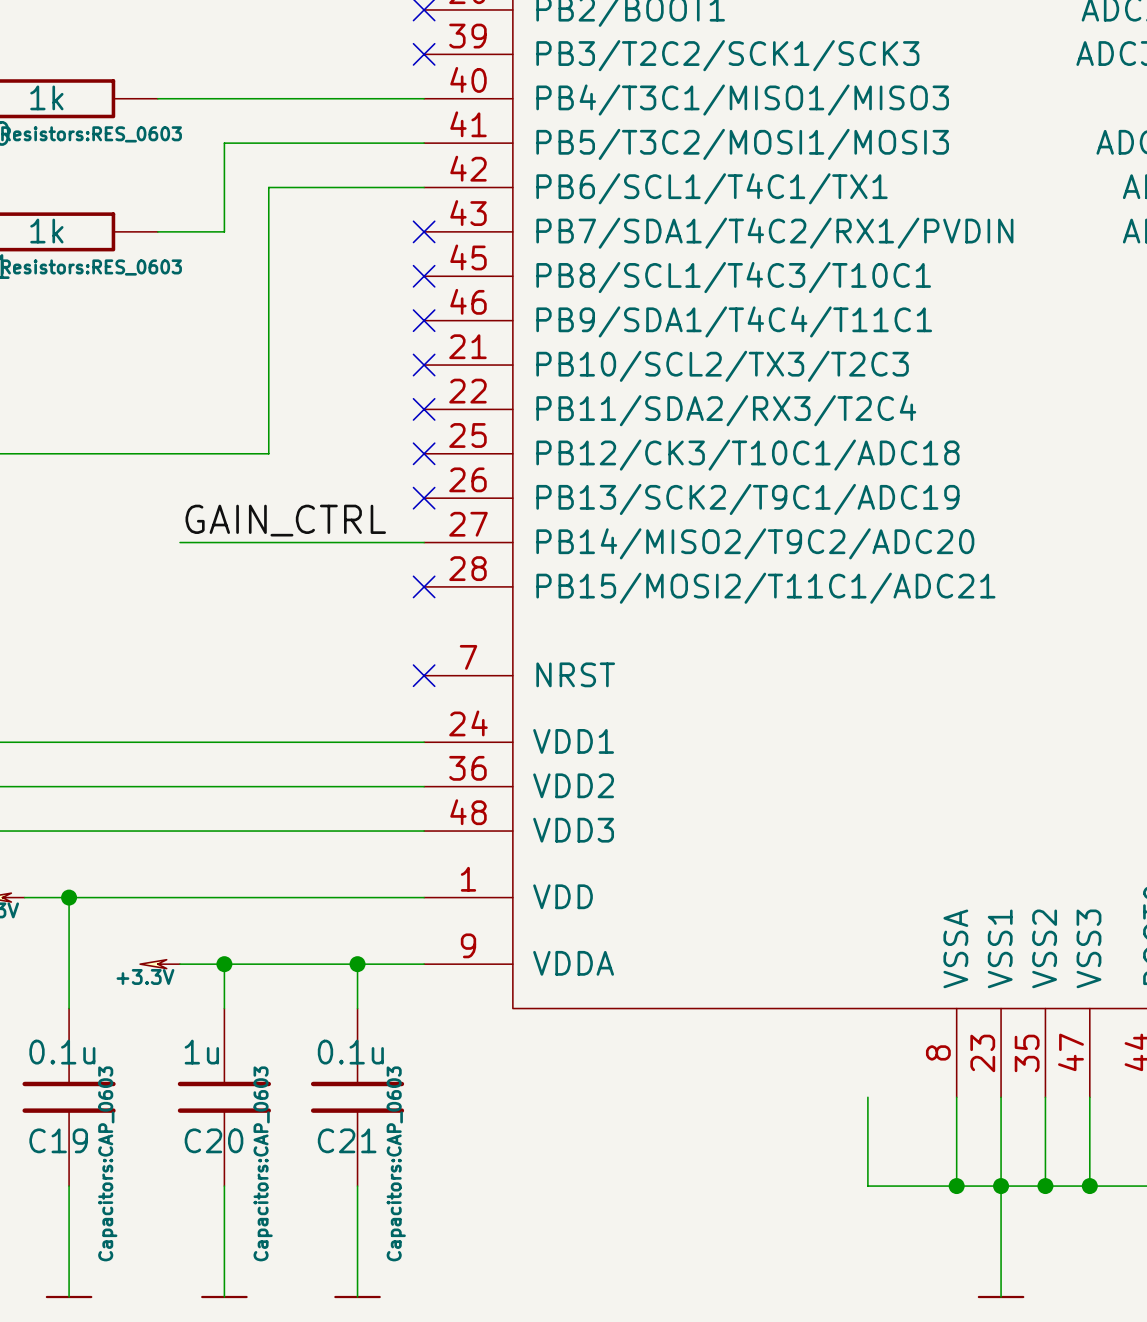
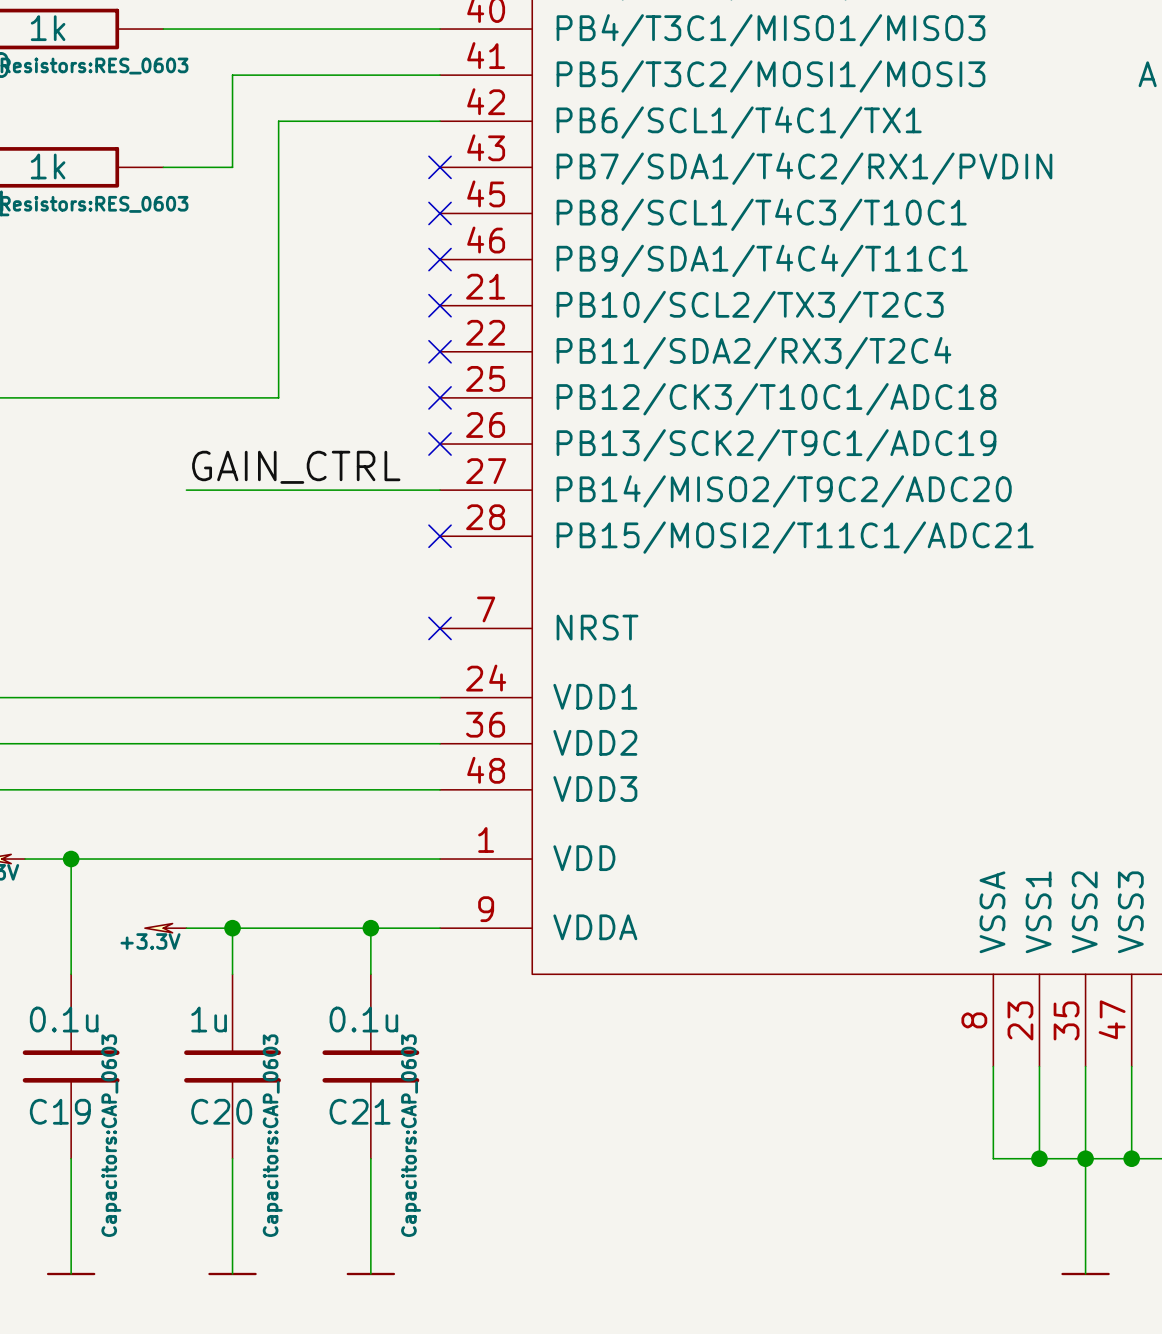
wire: (867, 1097) (867, 1186) (956, 1186) -> none
junction: (956, 1186) -> none
wire: (1001, 1186) (1001, 1297) -> (1085, 1158) (1085, 1274)
power symbol position: (1001, 1297) -> (1085, 1274)

